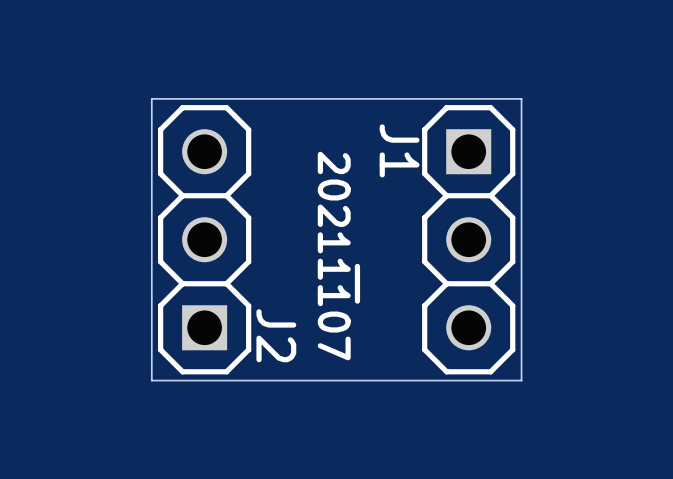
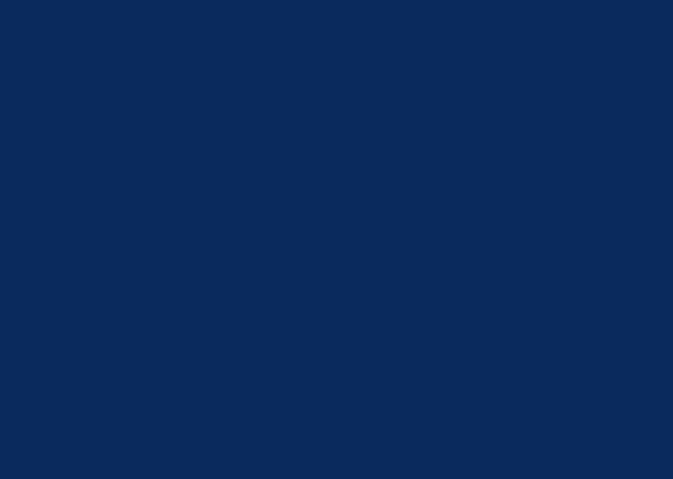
board edge: (521, 98) (521, 380) (151, 380) (151, 98) (521, 98) -> none
J2: (204, 239) -> none
J1: (468, 239) -> none
drawing: [354, 263, 361, 304] -> none

